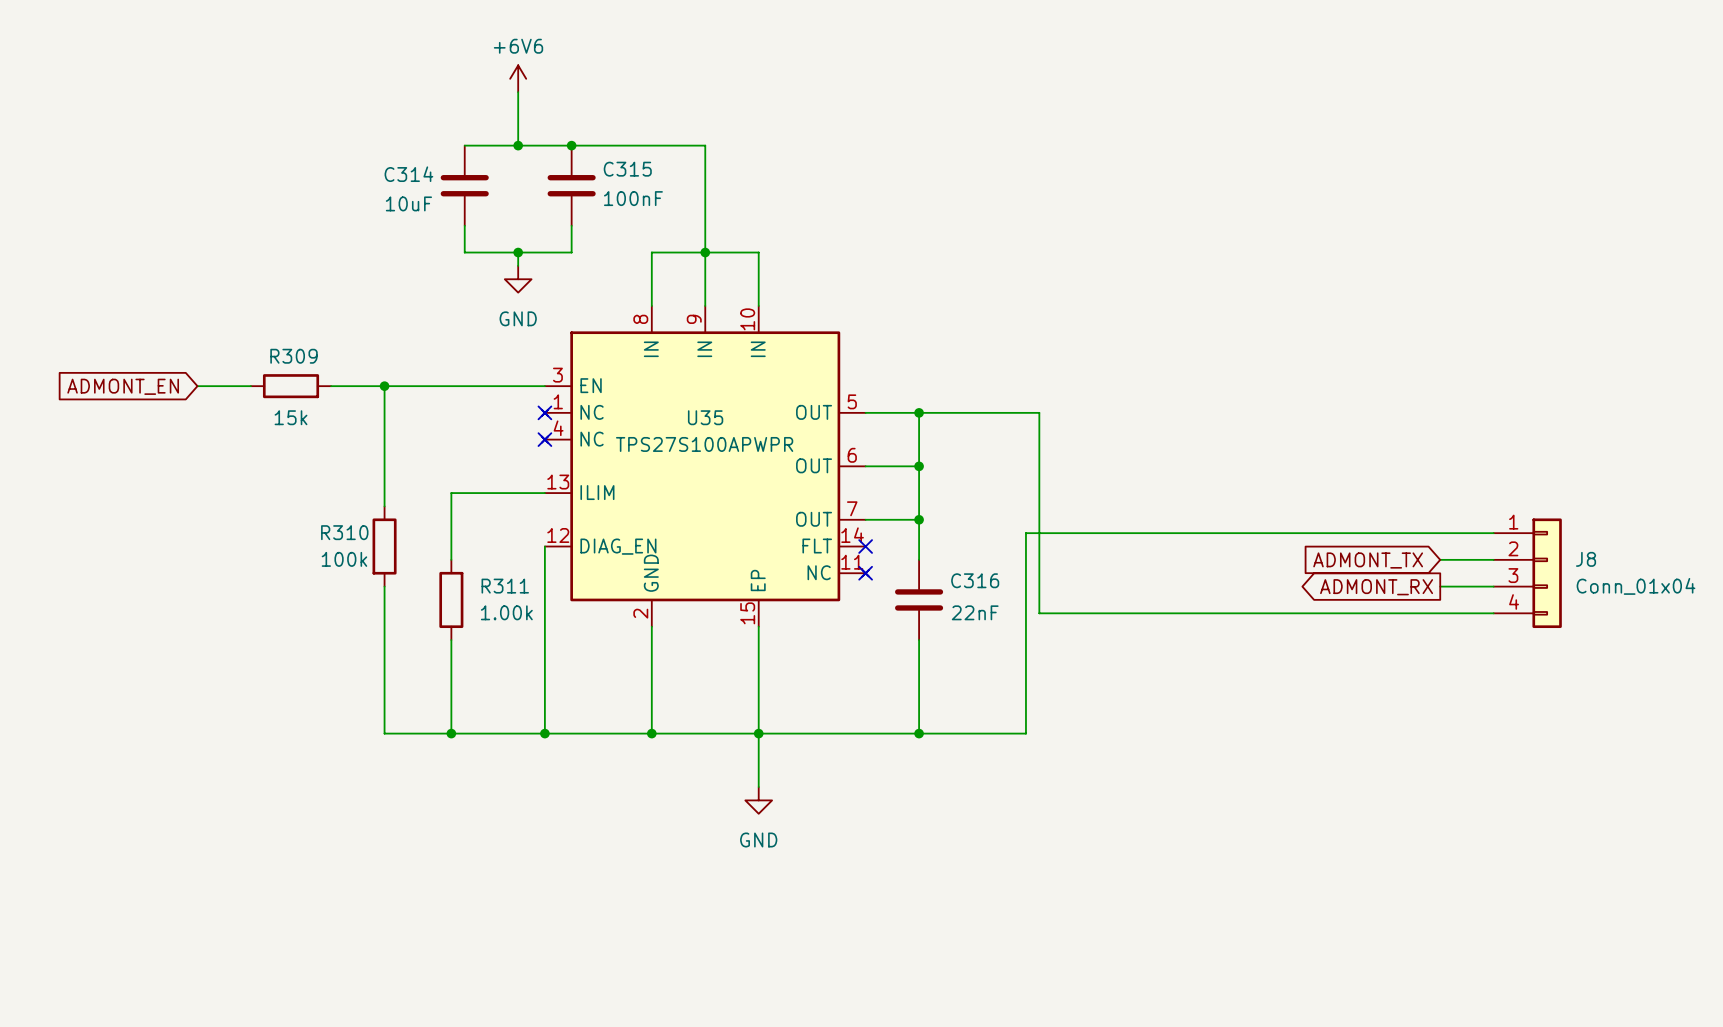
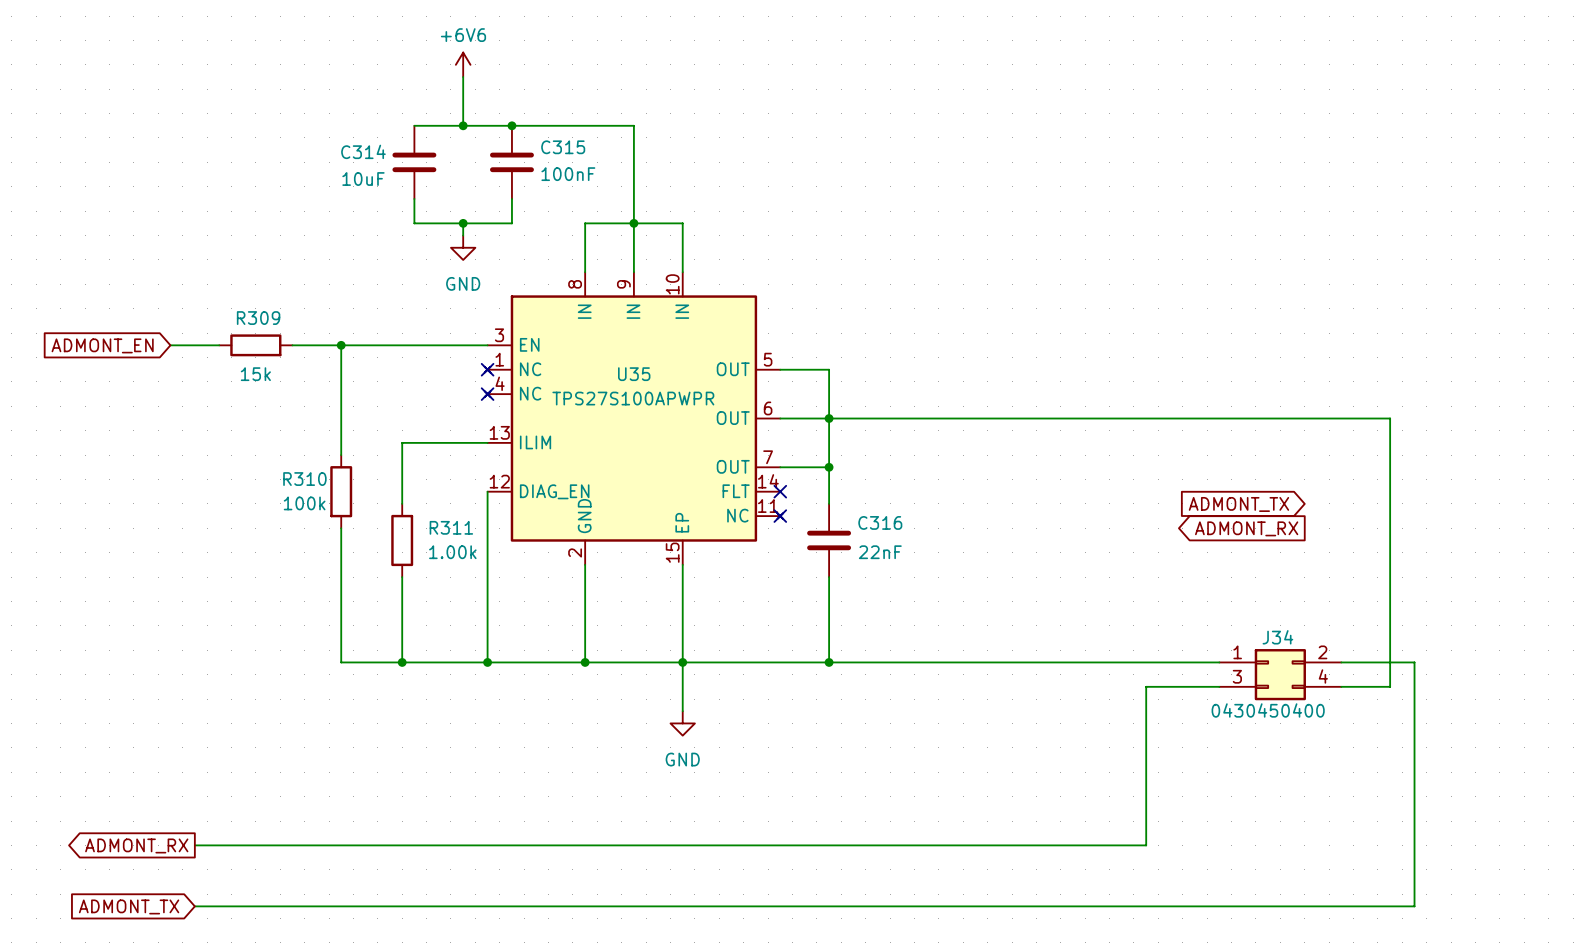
wire: (919, 412) (1039, 412) (1039, 613) (1493, 613) -> none
junction: (919, 412) -> none
wire: none -> (829, 418) (1390, 418) (1390, 686) (1341, 686)
wire: (1493, 533) (1025, 533) (1025, 733) -> (1219, 662) (926, 662)
wire: (1440, 559) (1493, 559) -> none
J8: Conn_01x04 (1527, 573) -> none
wire: (1440, 586) (1493, 586) -> none
wire: none -> (1341, 662) (1414, 662) (1414, 906) (194, 906)
J34: none -> 0430450400 (1280, 674)
wire: none -> (1219, 686) (1146, 686) (1146, 845) (194, 845)
global label: none -> ADMONT_RX (136, 845)
global label: none -> ADMONT_TX (129, 906)

